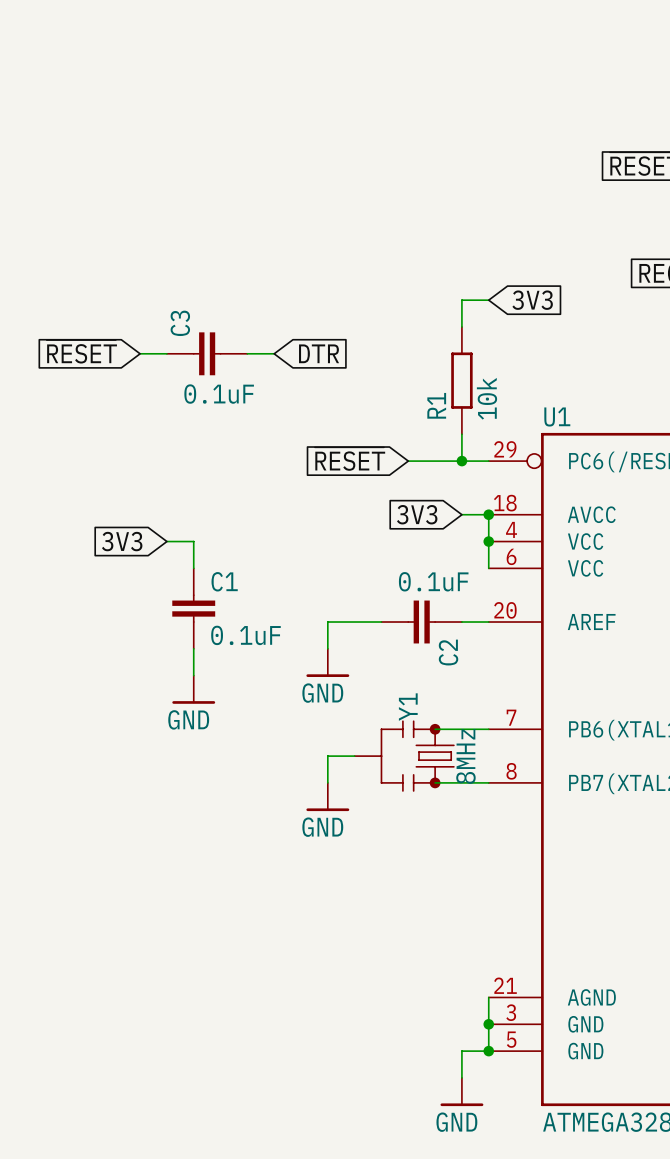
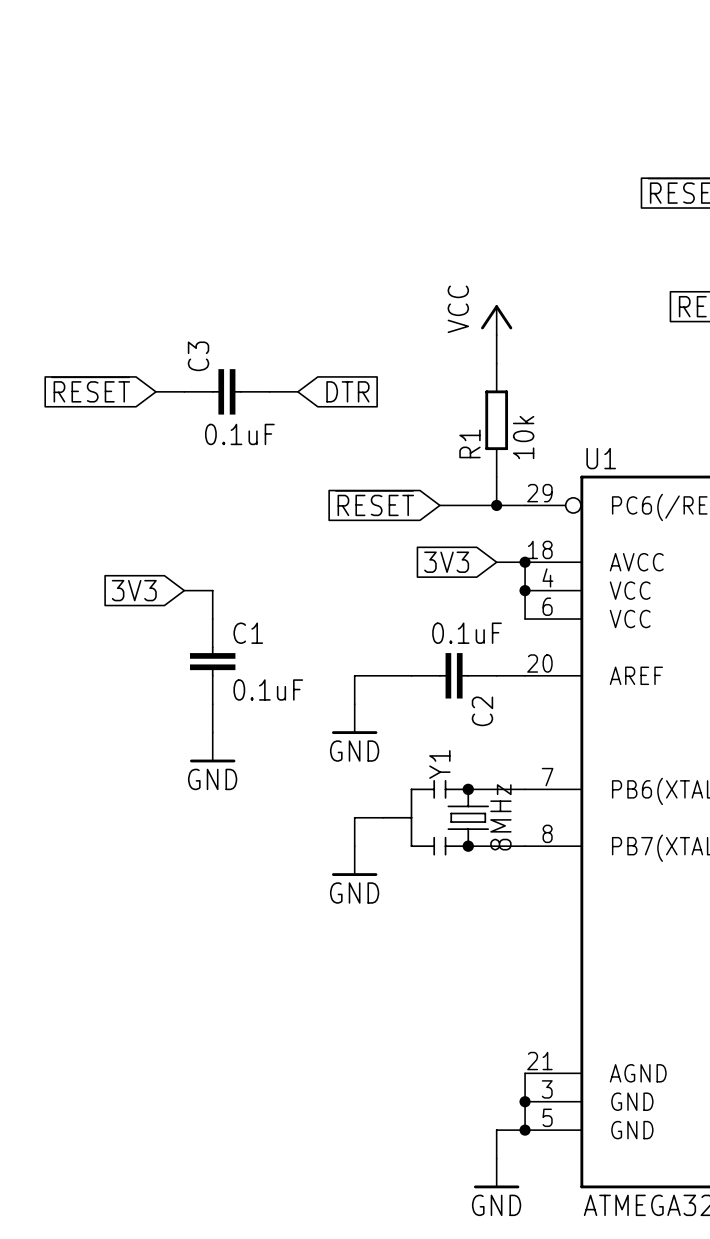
power symbol: none -> VCC (496, 320)
wire: (461, 300) (488, 300) -> none
global label: 3V3 (532, 300) -> none

